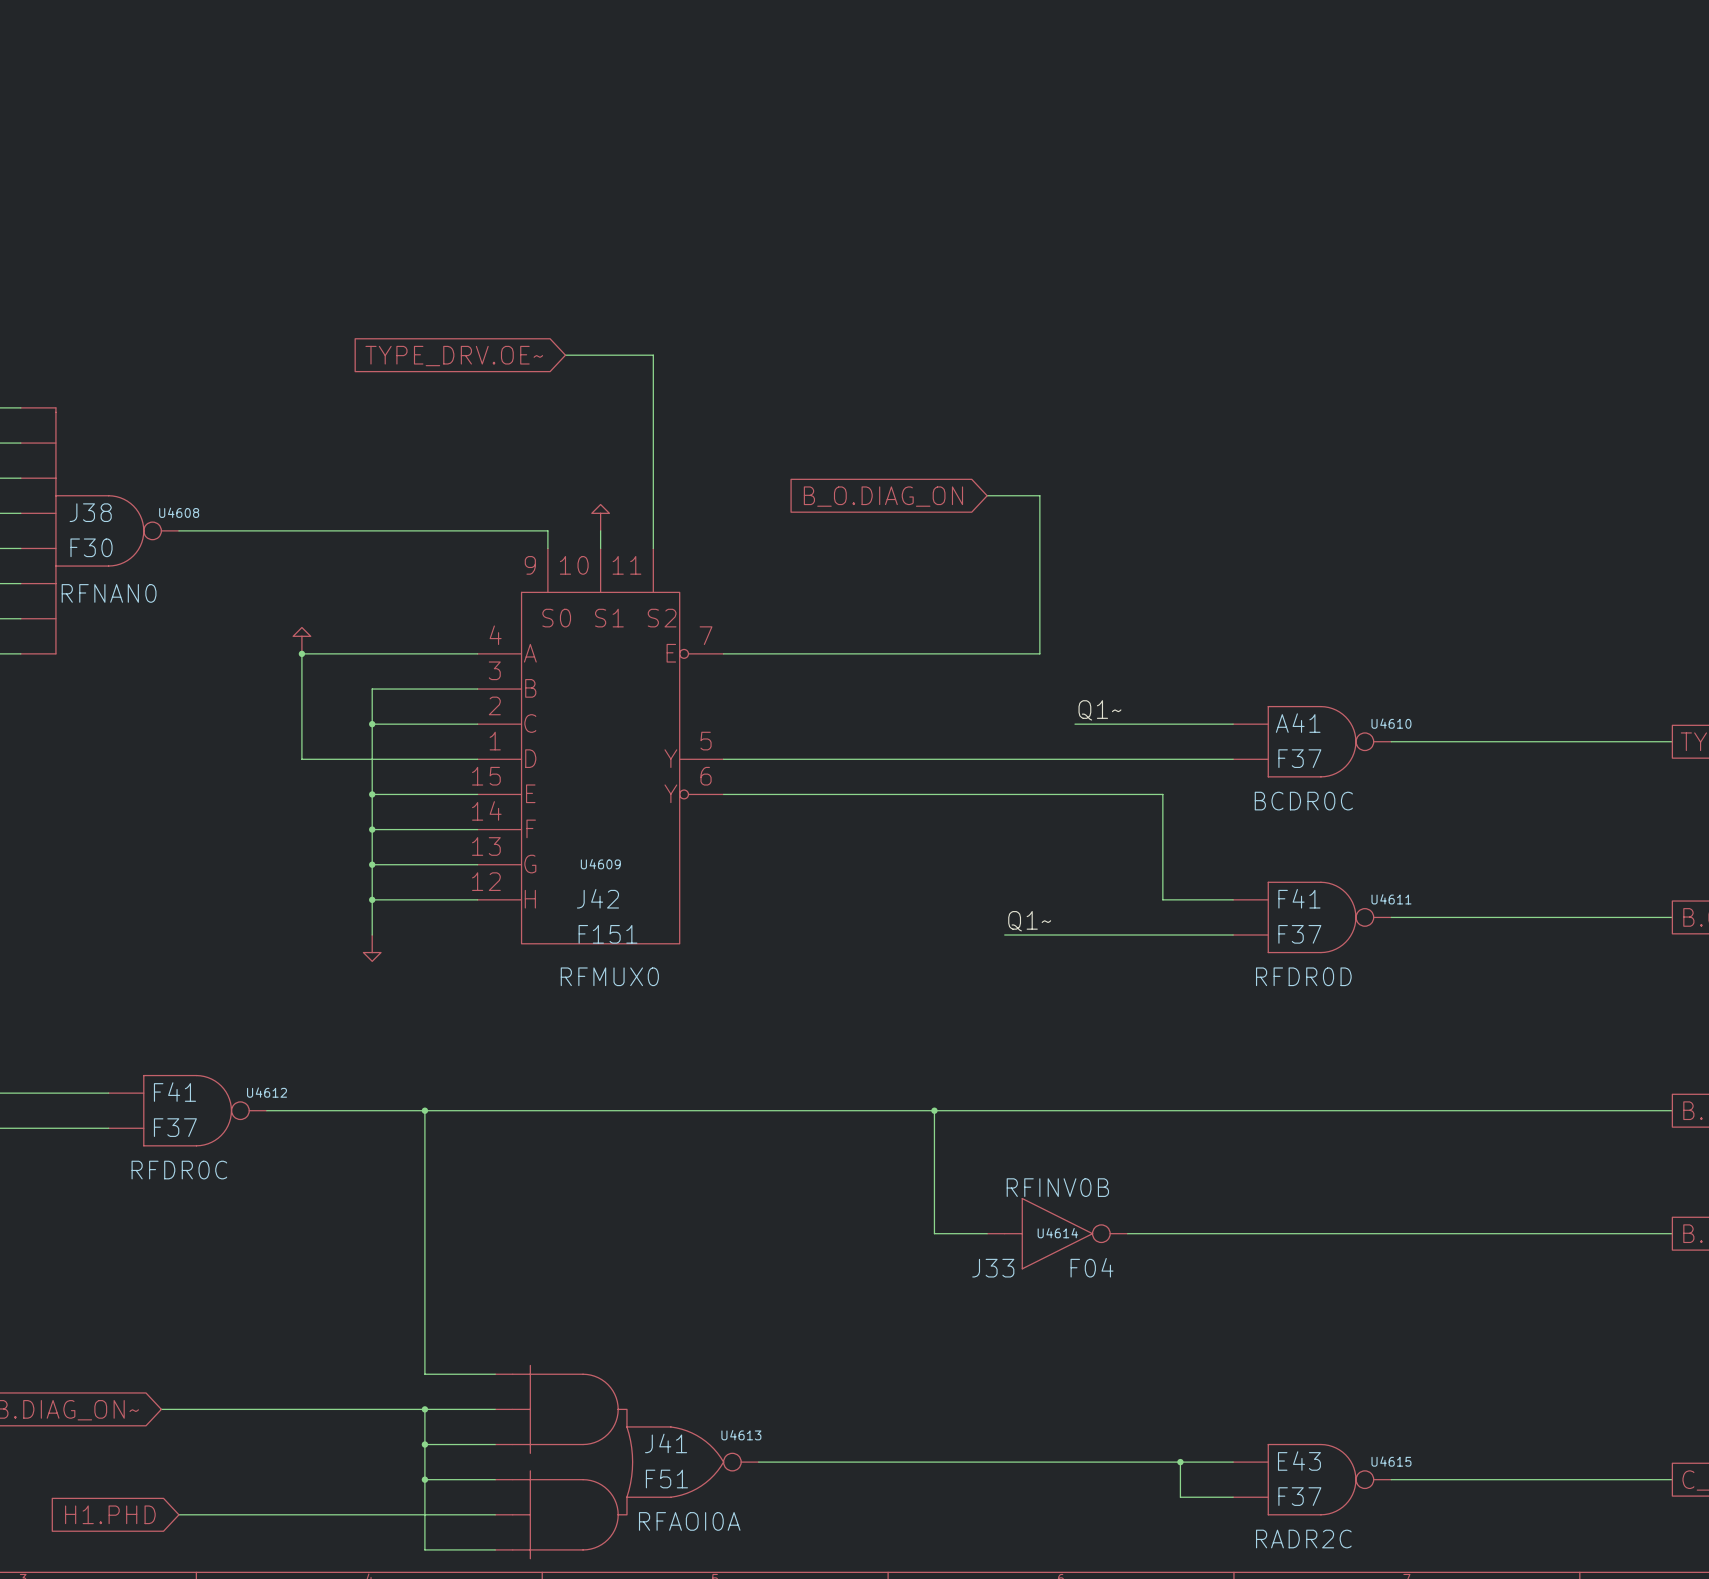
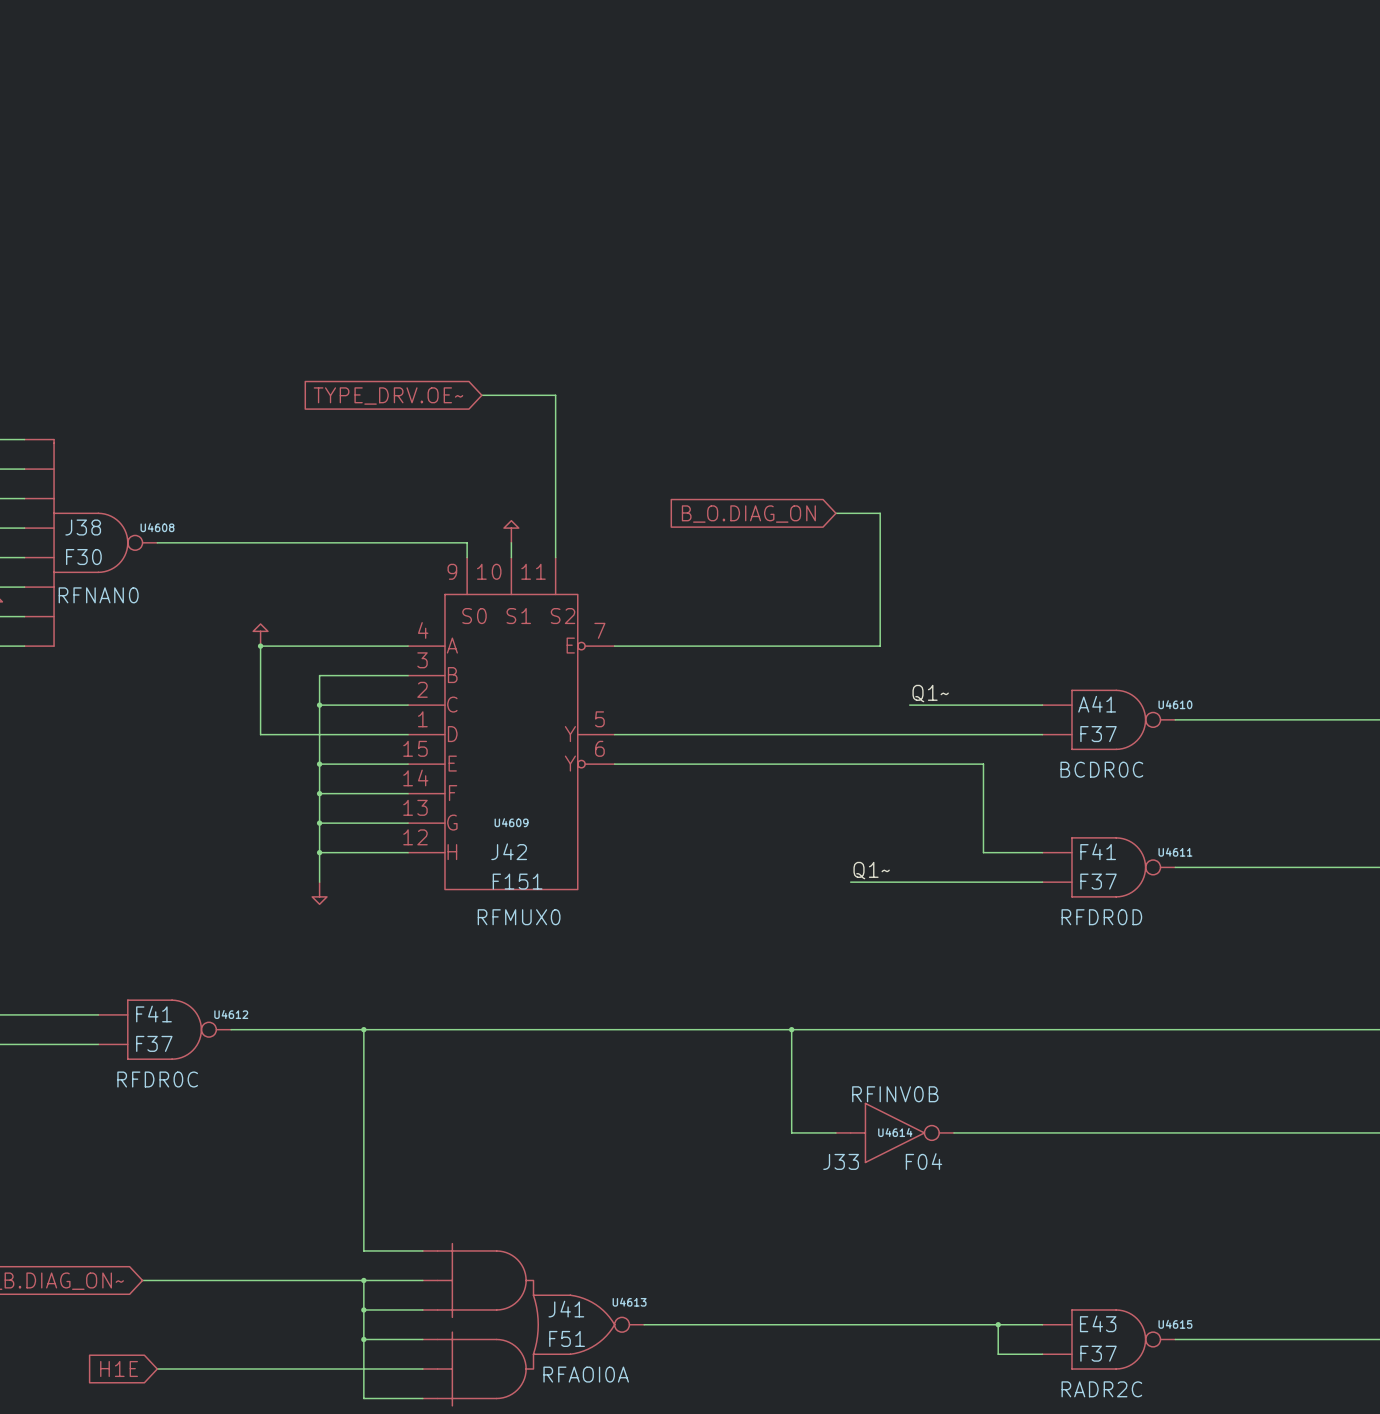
global label: H1.PHD (110, 1514) -> H1E (119, 1369)

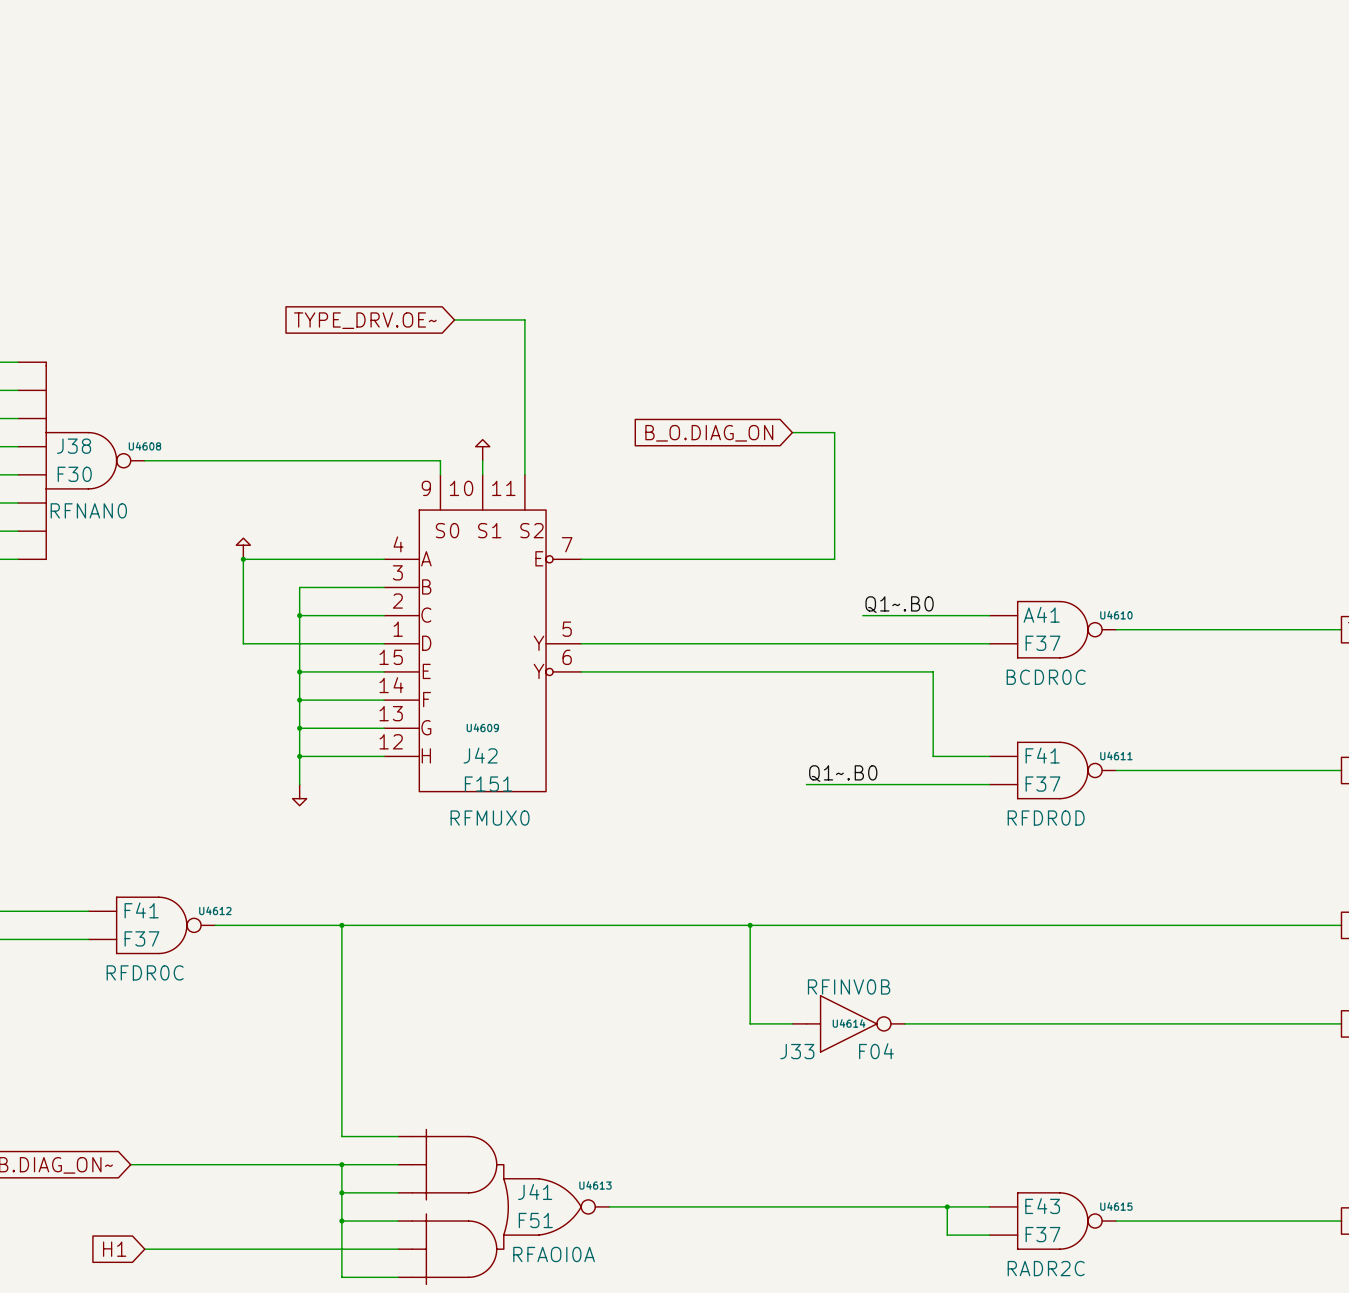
label: Q1~ (930, 693) -> Q1~.B0 (899, 604)
label: Q1~ (871, 870) -> Q1~.B0 (843, 773)
global label: H1E (119, 1369) -> H1 (114, 1249)

